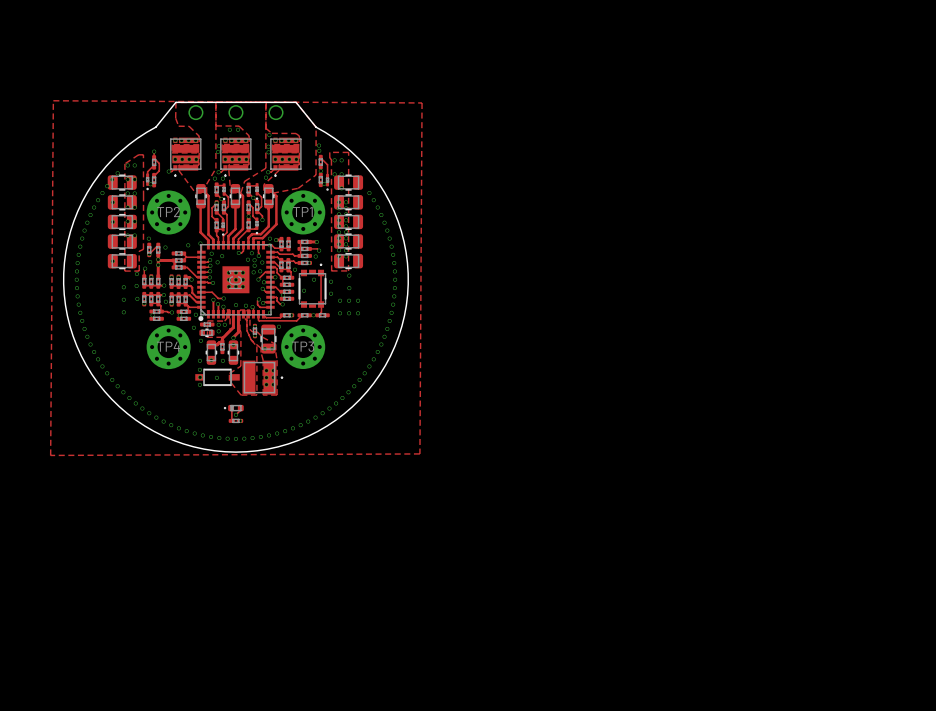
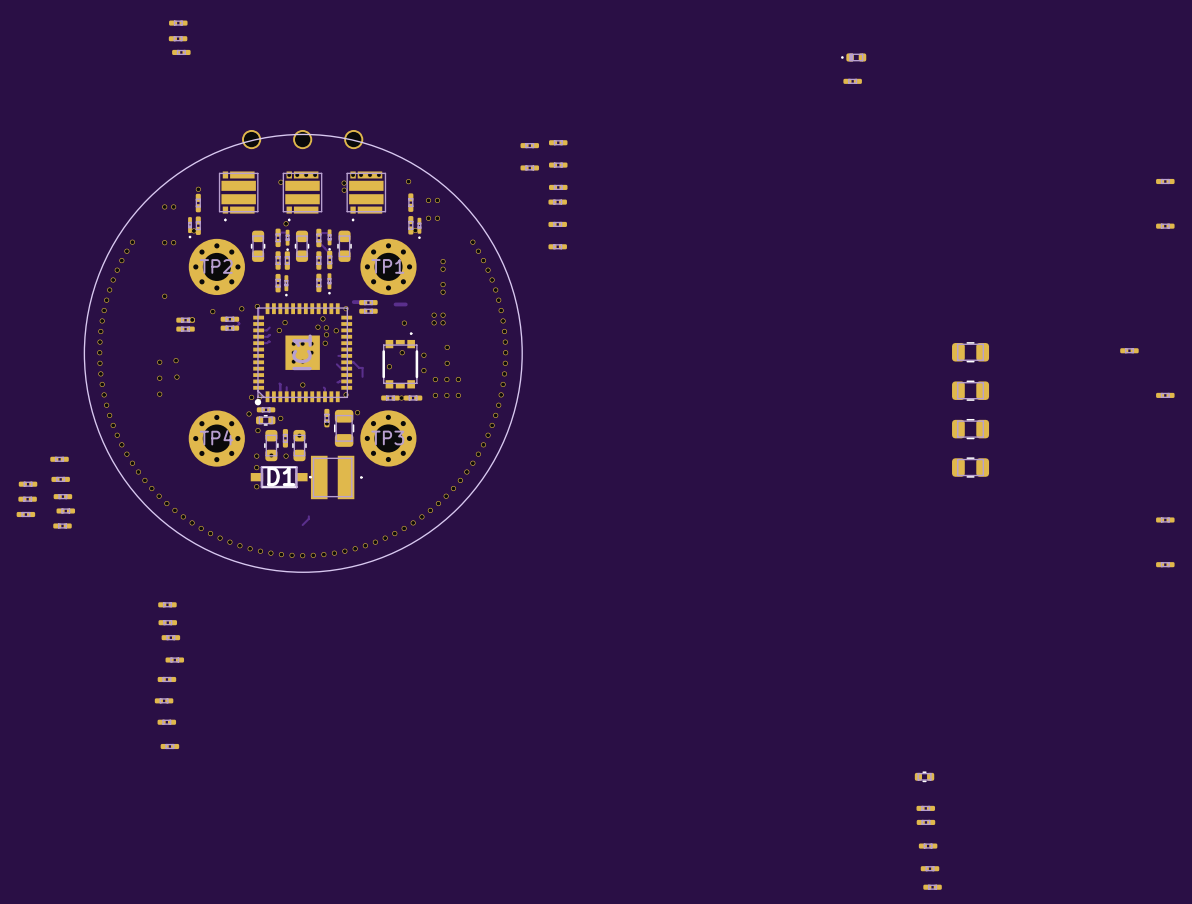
part: none -> (178, 23)
part: none -> (178, 38)
part: none -> (181, 52)
part: none -> (853, 57)
part: none -> (852, 81)
zone outline: (53, 100) (422, 102) (419, 453) (50, 455) (53, 100) -> none
board edge: (175, 102) (296, 102) (316, 127) (342, 144) (365, 166) (384, 192) (398, 221) (406, 252) (408, 284) (401, 326) (390, 356) (373, 383) (352, 406) (317, 431) (288, 443) (257, 450) (214, 450) (183, 443) (154, 431) (127, 413) (104, 391) (86, 365) (73, 336) (65, 305) (63, 273) (67, 241) (77, 211) (93, 183) (106, 166) (129, 144) (155, 127) (175, 102) -> none
zone outline: (215, 102) (265, 101) (265, 168) (244, 181) (240, 192) (230, 192) (228, 164) (248, 164) (249, 152) (222, 152) (222, 144) (249, 144) (249, 135) (239, 126) (215, 125) -> none
zone outline: (215, 102) (215, 168) (206, 184) (206, 193) (195, 193) (178, 170) (178, 165) (199, 165) (199, 152) (172, 152) (172, 144) (199, 144) (199, 136) (189, 126) (178, 126) (175, 118) (175, 102) (215, 102) -> none
zone outline: (295, 102) (316, 127) (316, 174) (298, 188) (272, 193) (263, 192) (263, 184) (279, 170) (279, 164) (299, 164) (299, 152) (272, 152) (272, 144) (299, 144) (299, 136) (296, 133) (271, 133) (265, 128) (266, 102) (295, 102) -> none
round board edge: none -> [84, 134, 523, 573]
part: none -> (558, 142)
part: none -> (529, 145)
via: (229, 129) -> none
via: (238, 129) -> none
part: none -> (558, 165)
part: none -> (529, 167)
via: (269, 135) -> none
via: (175, 140) -> none
via: (181, 140) -> none
via: (188, 140) -> none
via: (195, 140) -> none
part: none -> (1165, 181)
via: (319, 150) -> none
part: none -> (558, 187)
track: (154, 151) (154, 158) (159, 163) (159, 170) (154, 176) -> none
via: (218, 151) -> none
zone outline: (138, 154) (143, 154) (143, 249) (139, 251) (139, 271) (124, 271) (124, 163) (138, 154) -> none
track: (320, 157) (327, 164) (327, 176) -> none
via: (175, 159) -> none
via: (182, 159) -> none
via: (189, 159) -> none
via: (196, 159) -> none
via: (225, 159) -> none
via: (232, 159) -> none
via: (239, 159) -> none
via: (246, 159) -> none
via: (275, 159) -> none
via: (282, 159) -> none
via: (289, 159) -> none
via: (296, 159) -> none
part: none -> (557, 202)
track: (154, 166) (147, 171) (147, 176) -> none
track: (175, 167) (168, 171) -> none
track: (225, 167) (218, 172) -> none
track: (275, 167) (268, 172) -> none
via: (168, 171) -> none
via: (320, 171) -> none
via: (218, 172) -> none
via: (268, 172) -> none
via: (117, 173) -> none
via: (265, 177) -> none
via: (214, 178) -> none
via: (112, 179) -> none
via: (127, 179) -> none
via: (134, 179) -> none
part: none -> (557, 224)
part: none -> (1165, 226)
part: (122, 182) -> none
part: (348, 182) -> none
via: (107, 186) -> none
track: (201, 188) (208, 196) (208, 234) (213, 239) (213, 245) -> none
track: (235, 188) (242, 196) (242, 228) (233, 238) (233, 245) -> none
track: (268, 188) (276, 196) (276, 224) (262, 238) (253, 238) (253, 245) -> none
via: (341, 188) -> none
track: (224, 192) (228, 197) (228, 206) (223, 211) -> none
track: (257, 192) (261, 197) (261, 206) (257, 210) -> none
part: none -> (557, 246)
via: (253, 197) -> none
via: (221, 198) -> none
via: (112, 202) -> none
part: (122, 202) -> none
via: (339, 202) -> none
via: (346, 202) -> none
part: (348, 202) -> none
track: (216, 203) (212, 207) (212, 216) (216, 221) -> none
via: (216, 203) -> none
track: (248, 203) (252, 207) (252, 216) (256, 220) -> none
track: (201, 204) (200, 232) (208, 240) (208, 245) -> none
track: (235, 204) (235, 229) (228, 236) (228, 245) -> none
track: (268, 204) (268, 226) (260, 234) (252, 234) (248, 237) (248, 245) -> none
via: (127, 207) -> none
via: (134, 207) -> none
via: (339, 208) -> none
track: (216, 211) (223, 218) (223, 221) -> none
track: (223, 211) (227, 214) (227, 232) (223, 236) (223, 245) -> none
track: (257, 211) (262, 216) (262, 219) -> none
via: (339, 214) -> none
via: (248, 216) -> none
via: (262, 219) -> none
via: (339, 220) -> none
via: (346, 220) -> none
via: (127, 221) -> none
via: (134, 221) -> none
part: (348, 221) -> none
via: (112, 222) -> none
part: (122, 222) -> none
via: (339, 226) -> none
track: (256, 227) (248, 229) (238, 239) (238, 245) -> none
track: (223, 228) (216, 229) (218, 245) -> none
via: (339, 232) -> none
via: (134, 235) -> none
via: (148, 238) -> none
via: (269, 238) -> none
via: (339, 238) -> none
via: (346, 238) -> none
via: (276, 240) -> none
part: none -> (368, 302)
part: (122, 241) -> none
track: (300, 241) (300, 255) (270, 252) -> none
part: (304, 241) -> none
part: (348, 241) -> none
via: (316, 242) -> none
part: (281, 244) -> none
part: (288, 244) -> none
via: (339, 244) -> none
via: (346, 244) -> none
track: (158, 245) (149, 254) -> none
track: (243, 245) (243, 251) (239, 253) -> none
track: (258, 245) (258, 255) -> none
track: (263, 245) (271, 245) (274, 248) (288, 248) -> none
part: none -> (368, 311)
part: (304, 248) -> none
track: (308, 248) (319, 250) -> none
part: (149, 249) -> none
part: (158, 249) -> none
via: (319, 250) -> none
via: (238, 252) -> none
via: (211, 253) -> none
part: none -> (185, 320)
track: (158, 254) (158, 277) -> none
via: (258, 255) -> none
part: (304, 255) -> none
track: (186, 257) (201, 257) -> none
track: (270, 257) (288, 261) -> none
track: (158, 259) (174, 260) (174, 267) -> none
via: (158, 259) -> none
via: (210, 260) -> none
via: (112, 261) -> none
part: (122, 261) -> none
part: none -> (185, 329)
track: (288, 261) (300, 262) -> none
part: (348, 261) -> none
via: (150, 262) -> none
track: (270, 262) (274, 262) (281, 269) -> none
part: (304, 262) -> none
via: (308, 262) -> none
via: (158, 265) -> none
via: (210, 265) -> none
part: (281, 265) -> none
part: (288, 265) -> none
part: (178, 267) -> none
track: (182, 267) (187, 267) (197, 277) (209, 277) (209, 277) (201, 277) (201, 277) -> none
track: (270, 267) (277, 269) (277, 272) (282, 277) (282, 284) -> none
track: (145, 268) (144, 277) -> none
via: (145, 268) -> none
track: (281, 269) (288, 269) (291, 272) (291, 277) -> none
via: (295, 269) -> none
zone outline: (331, 270) (348, 270) (348, 152) (329, 152) (331, 159) (331, 271) -> none
via: (210, 271) -> none
via: (260, 271) -> none
track: (270, 272) (265, 272) (258, 279) -> none
track: (321, 273) (321, 312) (318, 315) (308, 315) -> none
via: (136, 274) -> none
via: (151, 277) -> none
via: (171, 277) -> none
via: (178, 277) -> none
track: (185, 277) (191, 279) -> none
via: (209, 277) -> none
via: (275, 277) -> none
part: (287, 277) -> none
part: none -> (1129, 350)
via: (191, 279) -> none
via: (235, 279) -> none
via: (258, 279) -> none
part: none -> (970, 352)
part: (144, 281) -> none
part: (151, 281) -> none
part: (158, 281) -> none
part: (171, 281) -> none
part: (178, 281) -> none
part: (185, 281) -> none
track: (201, 282) (213, 282) -> none
via: (213, 282) -> none
via: (263, 282) -> none
part: (287, 284) -> none
track: (144, 285) (164, 285) -> none
via: (164, 285) -> none
track: (171, 285) (185, 285) -> none
track: (185, 285) (190, 285) (192, 292) (196, 297) (201, 297) -> none
via: (242, 286) -> none
via: (262, 288) -> none
part: (287, 291) -> none
track: (201, 292) (212, 292) (218, 298) (223, 298) -> none
track: (144, 295) (164, 295) -> none
via: (163, 295) -> none
track: (171, 295) (189, 295) (196, 302) (201, 302) -> none
via: (282, 295) -> none
track: (270, 297) (276, 297) (277, 300) (282, 304) -> none
via: (223, 298) -> none
part: (287, 298) -> none
part: (144, 299) -> none
part: (151, 299) -> none
part: (158, 299) -> none
part: (171, 299) -> none
part: (178, 299) -> none
part: (185, 299) -> none
track: (213, 299) (213, 314) -> none
via: (213, 299) -> none
track: (258, 299) (257, 304) (260, 307) (270, 307) -> none
via: (258, 299) -> none
via: (165, 301) -> none
via: (144, 303) -> none
track: (151, 303) (158, 303) -> none
track: (158, 303) (160, 305) (160, 311) -> none
via: (171, 303) -> none
track: (178, 303) (185, 303) (189, 307) (201, 307) -> none
via: (263, 303) -> none
via: (217, 304) -> none
via: (282, 304) -> none
track: (188, 305) (187, 311) -> none
via: (245, 305) -> none
via: (223, 306) -> none
via: (252, 307) -> none
zone outline: (226, 309) (230, 309) (230, 329) (222, 337) (207, 337) (207, 320) (224, 321) (226, 318) (226, 309) -> none
part: none -> (970, 390)
part: (156, 311) -> none
track: (160, 311) (171, 312) -> none
part: (183, 311) -> none
via: (171, 312) -> none
part: none -> (1165, 395)
track: (233, 314) (233, 327) (222, 338) (222, 342) (211, 344) -> none
track: (238, 314) (238, 332) (233, 337) -> none
track: (258, 314) (259, 320) (296, 320) (300, 315) -> none
track: (263, 314) (266, 317) (280, 317) (282, 315) -> none
via: (152, 315) -> none
via: (179, 315) -> none
part: (286, 315) -> none
via: (291, 315) -> none
part: (156, 318) -> none
part: (183, 318) -> none
zone outline: (246, 320) (244, 318) (244, 309) (239, 310) (240, 366) (229, 373) (229, 380) (241, 395) (256, 395) (256, 346) (251, 340) -> none
via: (218, 324) -> none
via: (224, 324) -> none
via: (254, 326) -> none
via: (233, 338) -> none
part: none -> (970, 429)
zone outline: (251, 340) (246, 330) (246, 310) (249, 310) (249, 329) (257, 331) (275, 344) (277, 395) (263, 395) (263, 360) (260, 348) (251, 340) -> none
via: (264, 348) -> none
via: (271, 348) -> none
part: none -> (59, 459)
part: none -> (970, 467)
via: (266, 370) -> none
via: (273, 370) -> none
via: (200, 377) -> none
via: (216, 377) -> none
part: (217, 377) -> none
D1: none -> (281, 477)
via: (266, 377) -> none
via: (273, 377) -> none
part: none -> (60, 479)
part: none -> (28, 484)
via: (266, 384) -> none
via: (273, 384) -> none
part: none -> (62, 496)
part: none -> (27, 499)
part: none -> (65, 510)
part: none -> (25, 514)
track: (231, 408) (231, 420) -> none
part: (233, 408) -> none
part: none -> (1165, 519)
via: (235, 414) -> none
part: none -> (62, 525)
part: (235, 420) -> none
via: (240, 420) -> none
part: none -> (1165, 564)
part: none -> (167, 604)
part: none -> (167, 622)
part: none -> (170, 637)
part: none -> (174, 660)
part: none -> (166, 679)
part: none -> (164, 700)
part: none -> (166, 722)
part: none -> (169, 746)
part: none -> (924, 776)
part: none -> (925, 808)
part: none -> (925, 822)
part: none -> (928, 846)
part: none -> (930, 868)
part: none -> (932, 887)

